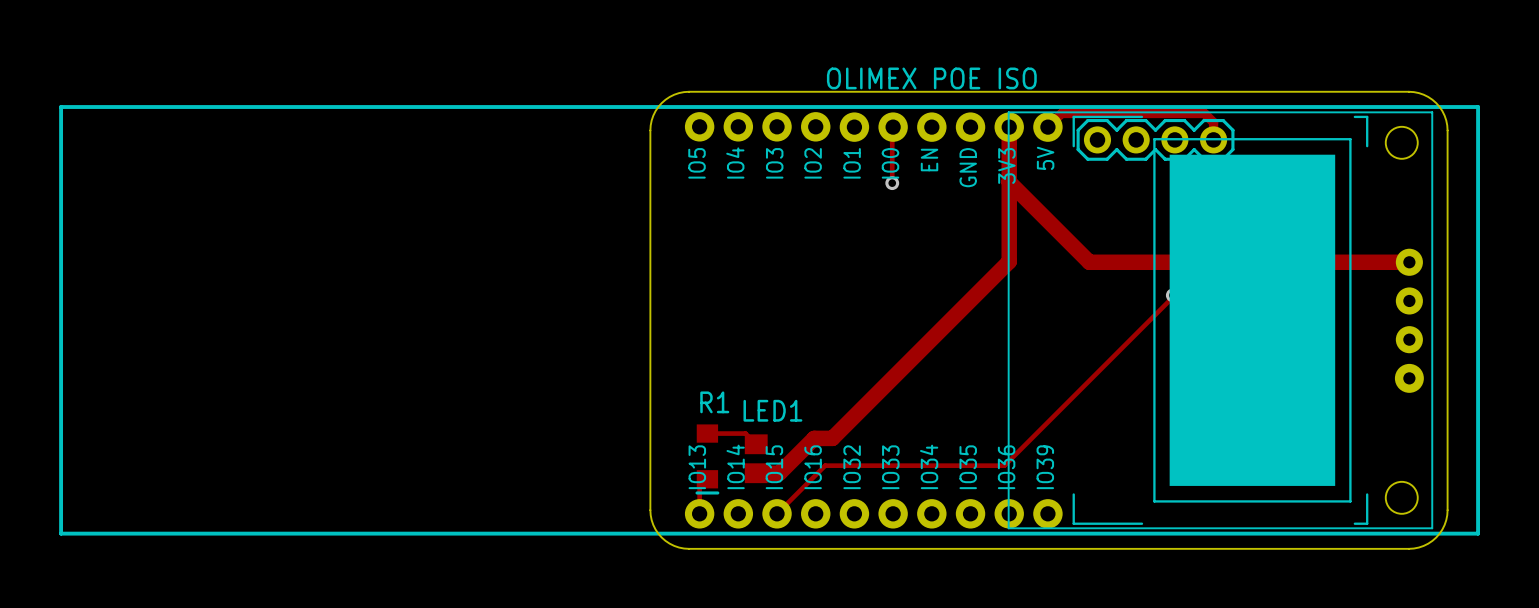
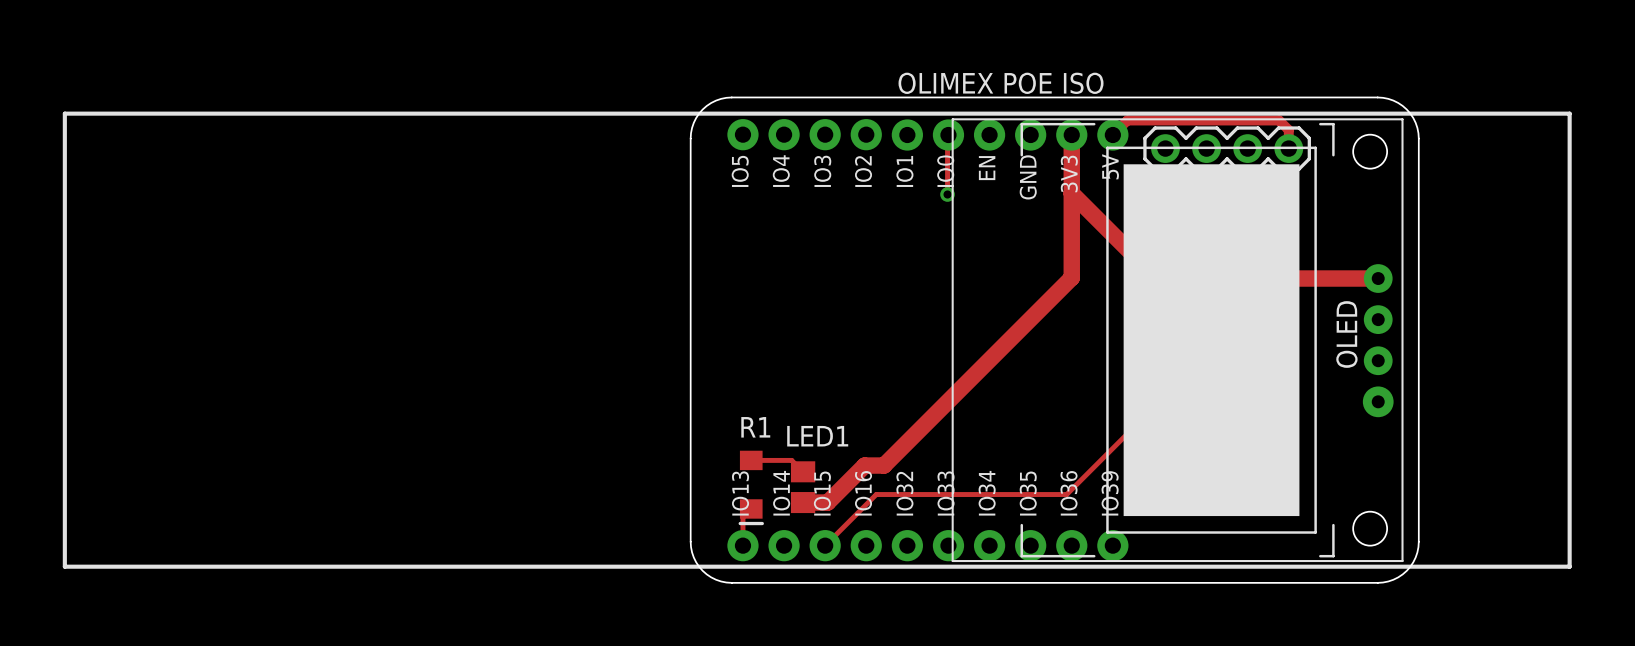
board edge: (1297, 91) (1418, 93) (1432, 99) (1439, 106) (1446, 120) (1447, 130) (1447, 510) (1444, 524) (1432, 540) (1413, 548) (1297, 548) -> (1377, 97) (1393, 100) (1406, 109) (1415, 122) (1418, 138) (1418, 547) (1415, 557) (1406, 570) (1393, 579) (1377, 582)
track: (1297, 262) (1409, 262) -> none
part position: (1220, 320) -> (1177, 340)

